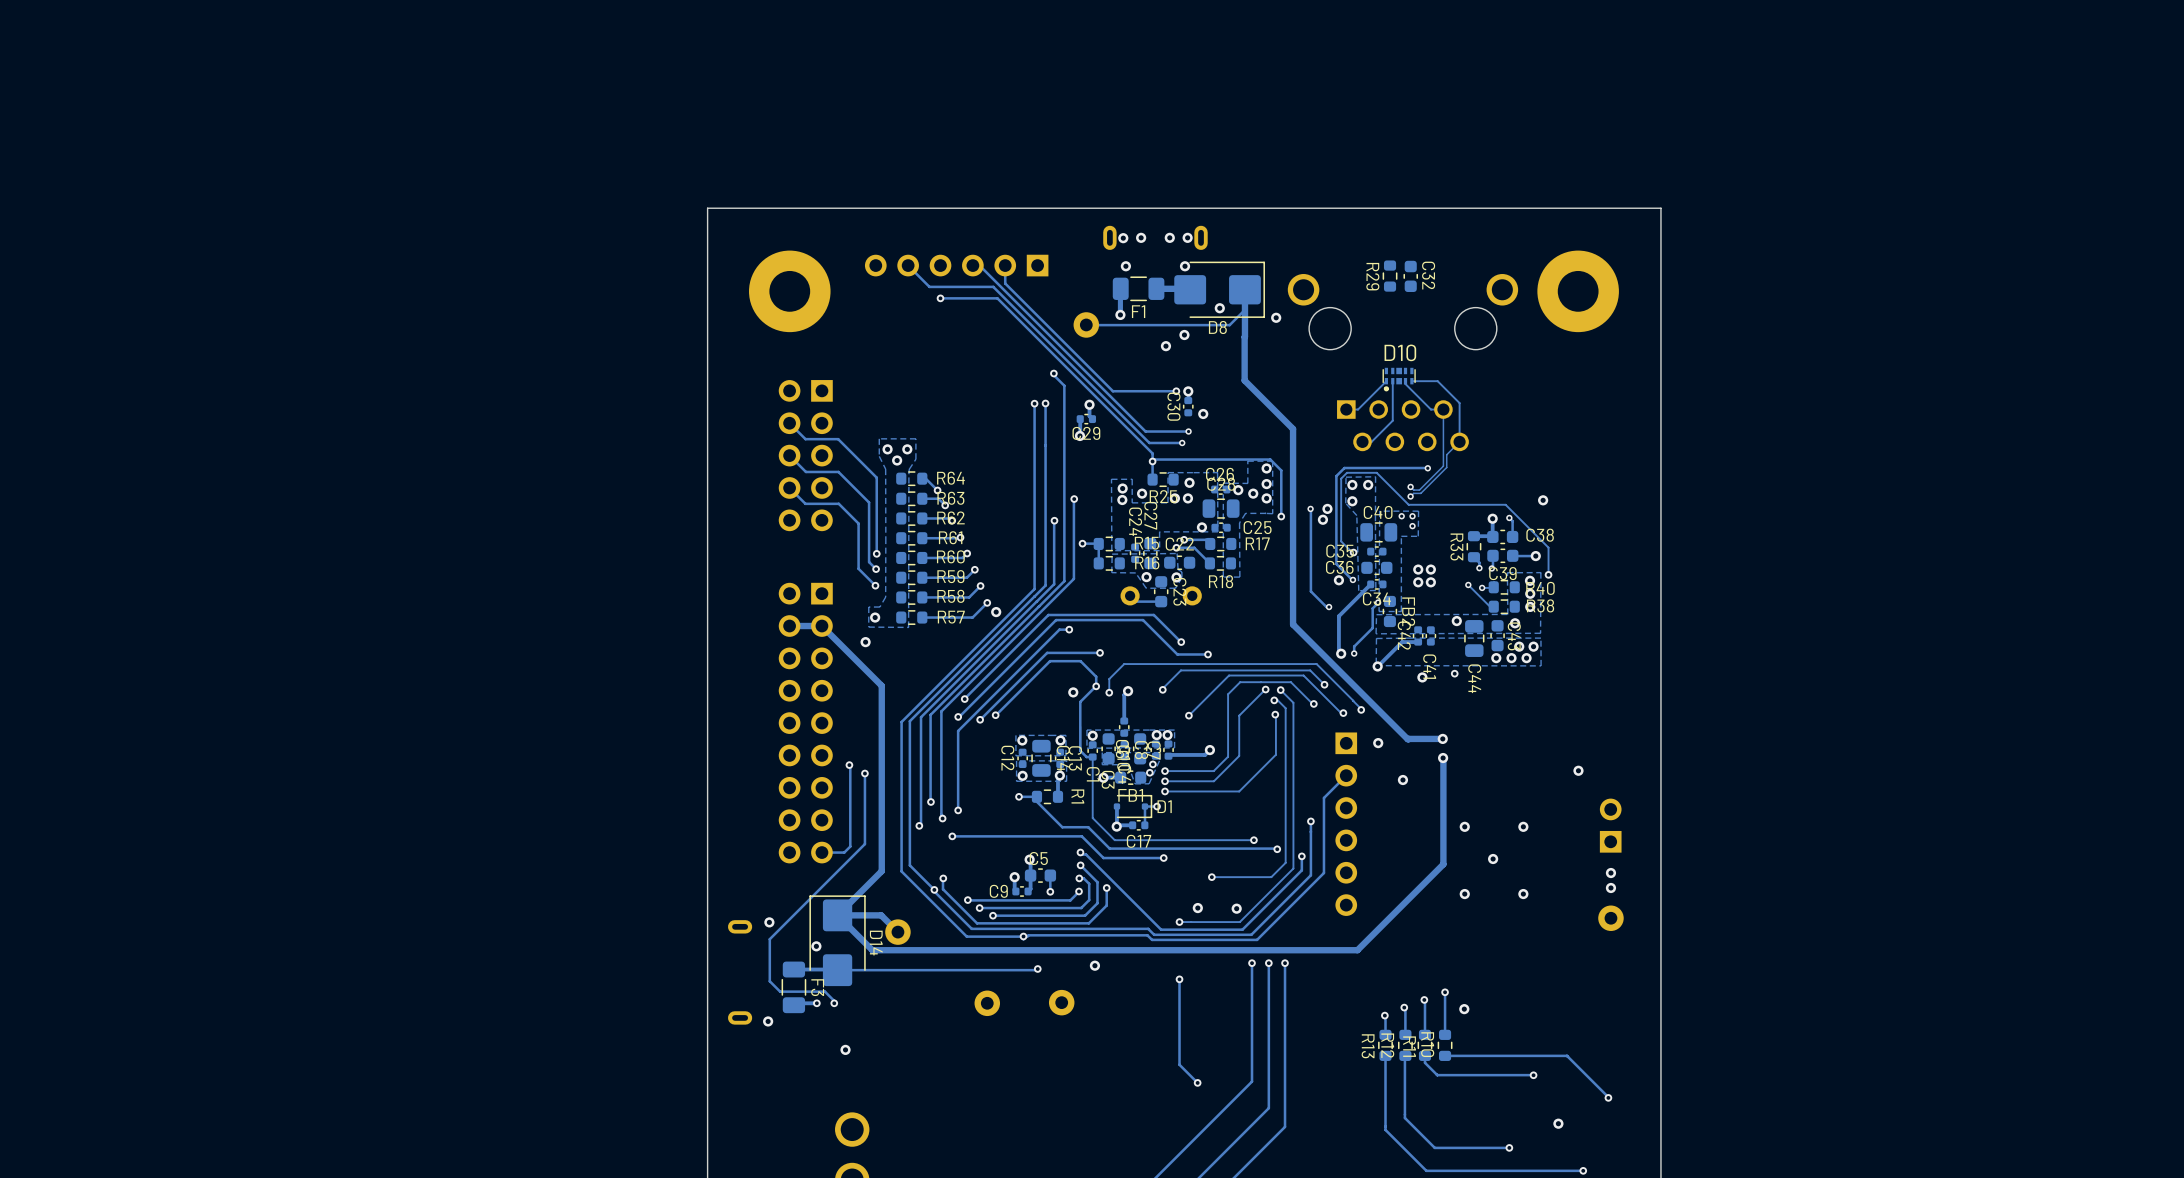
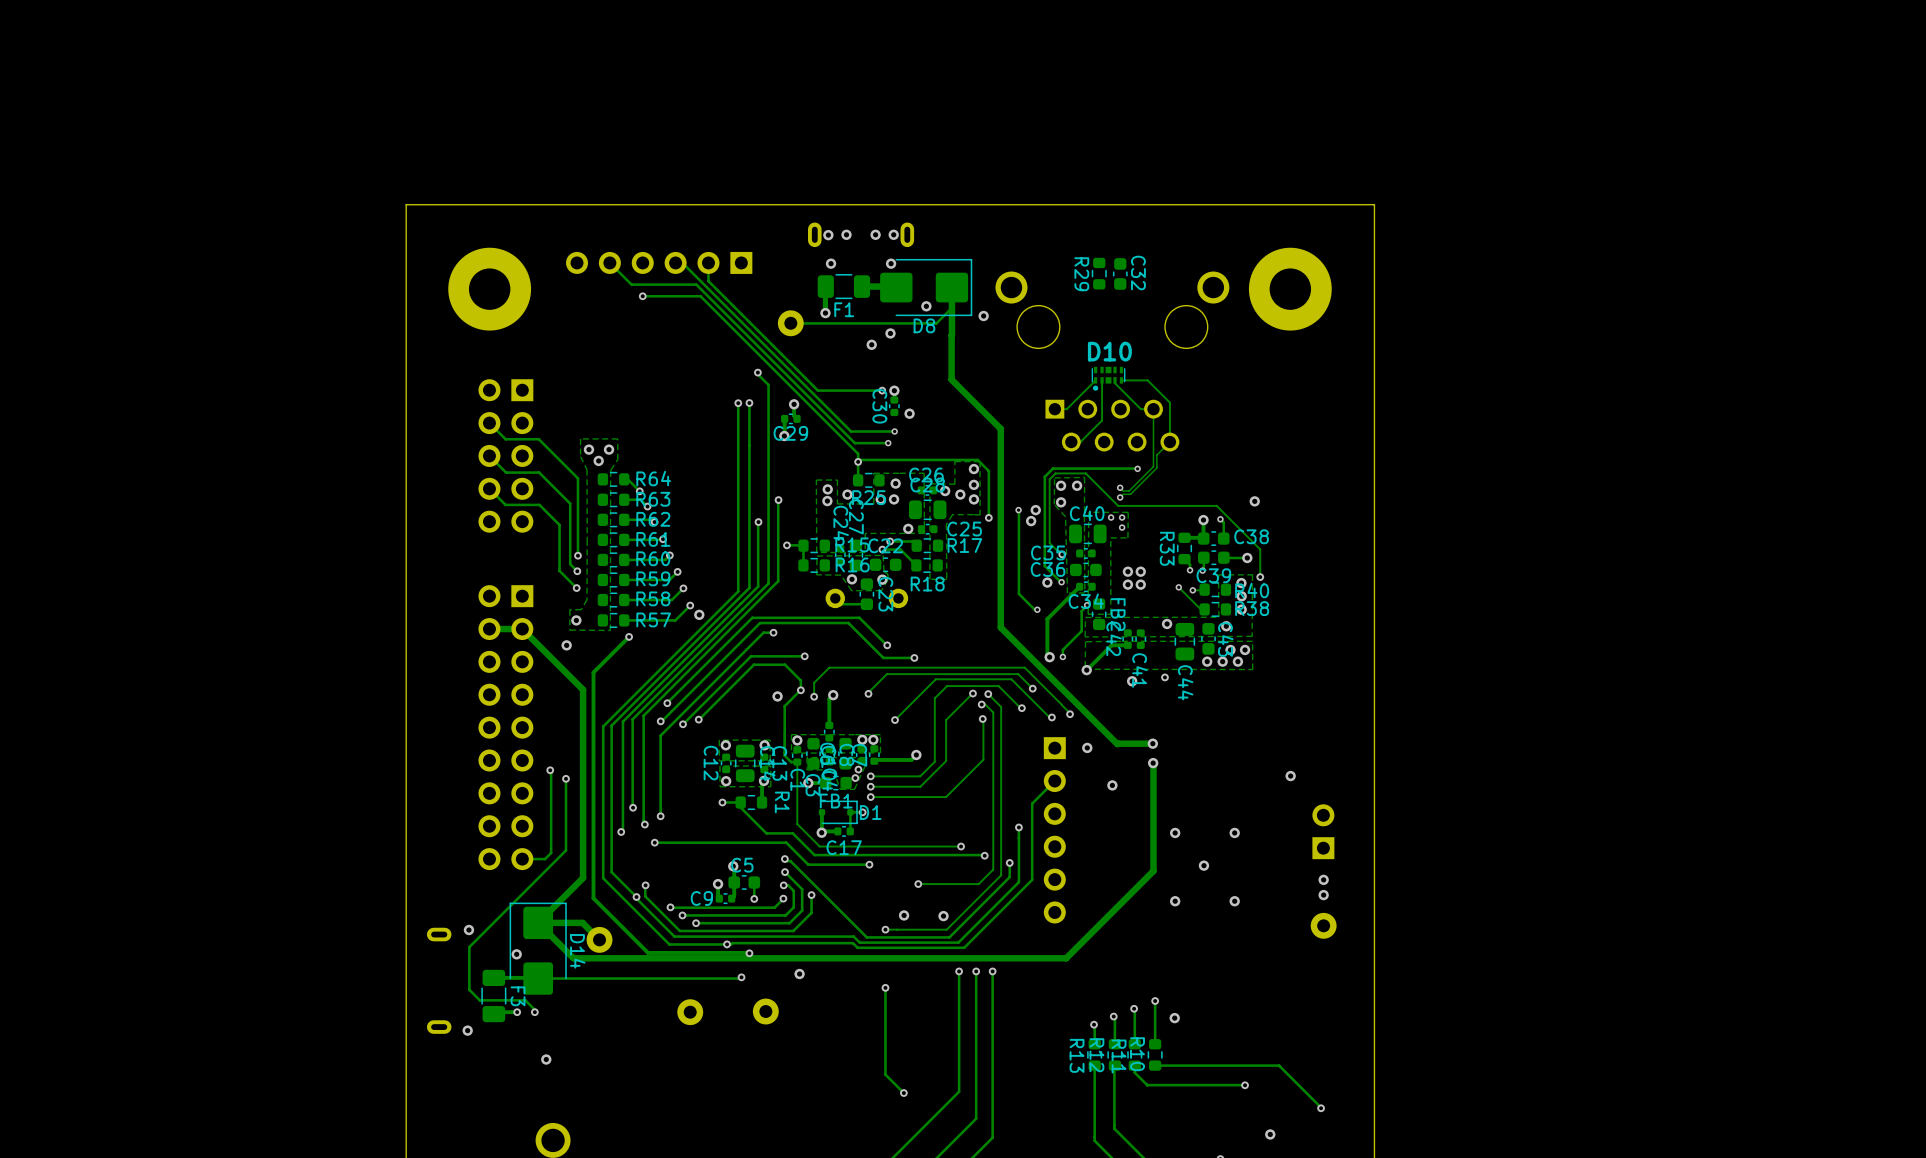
track: none -> (629, 636) (593, 672) (593, 898) (648, 952) (749, 953)
via: none -> (629, 636)
via: none -> (749, 953)

